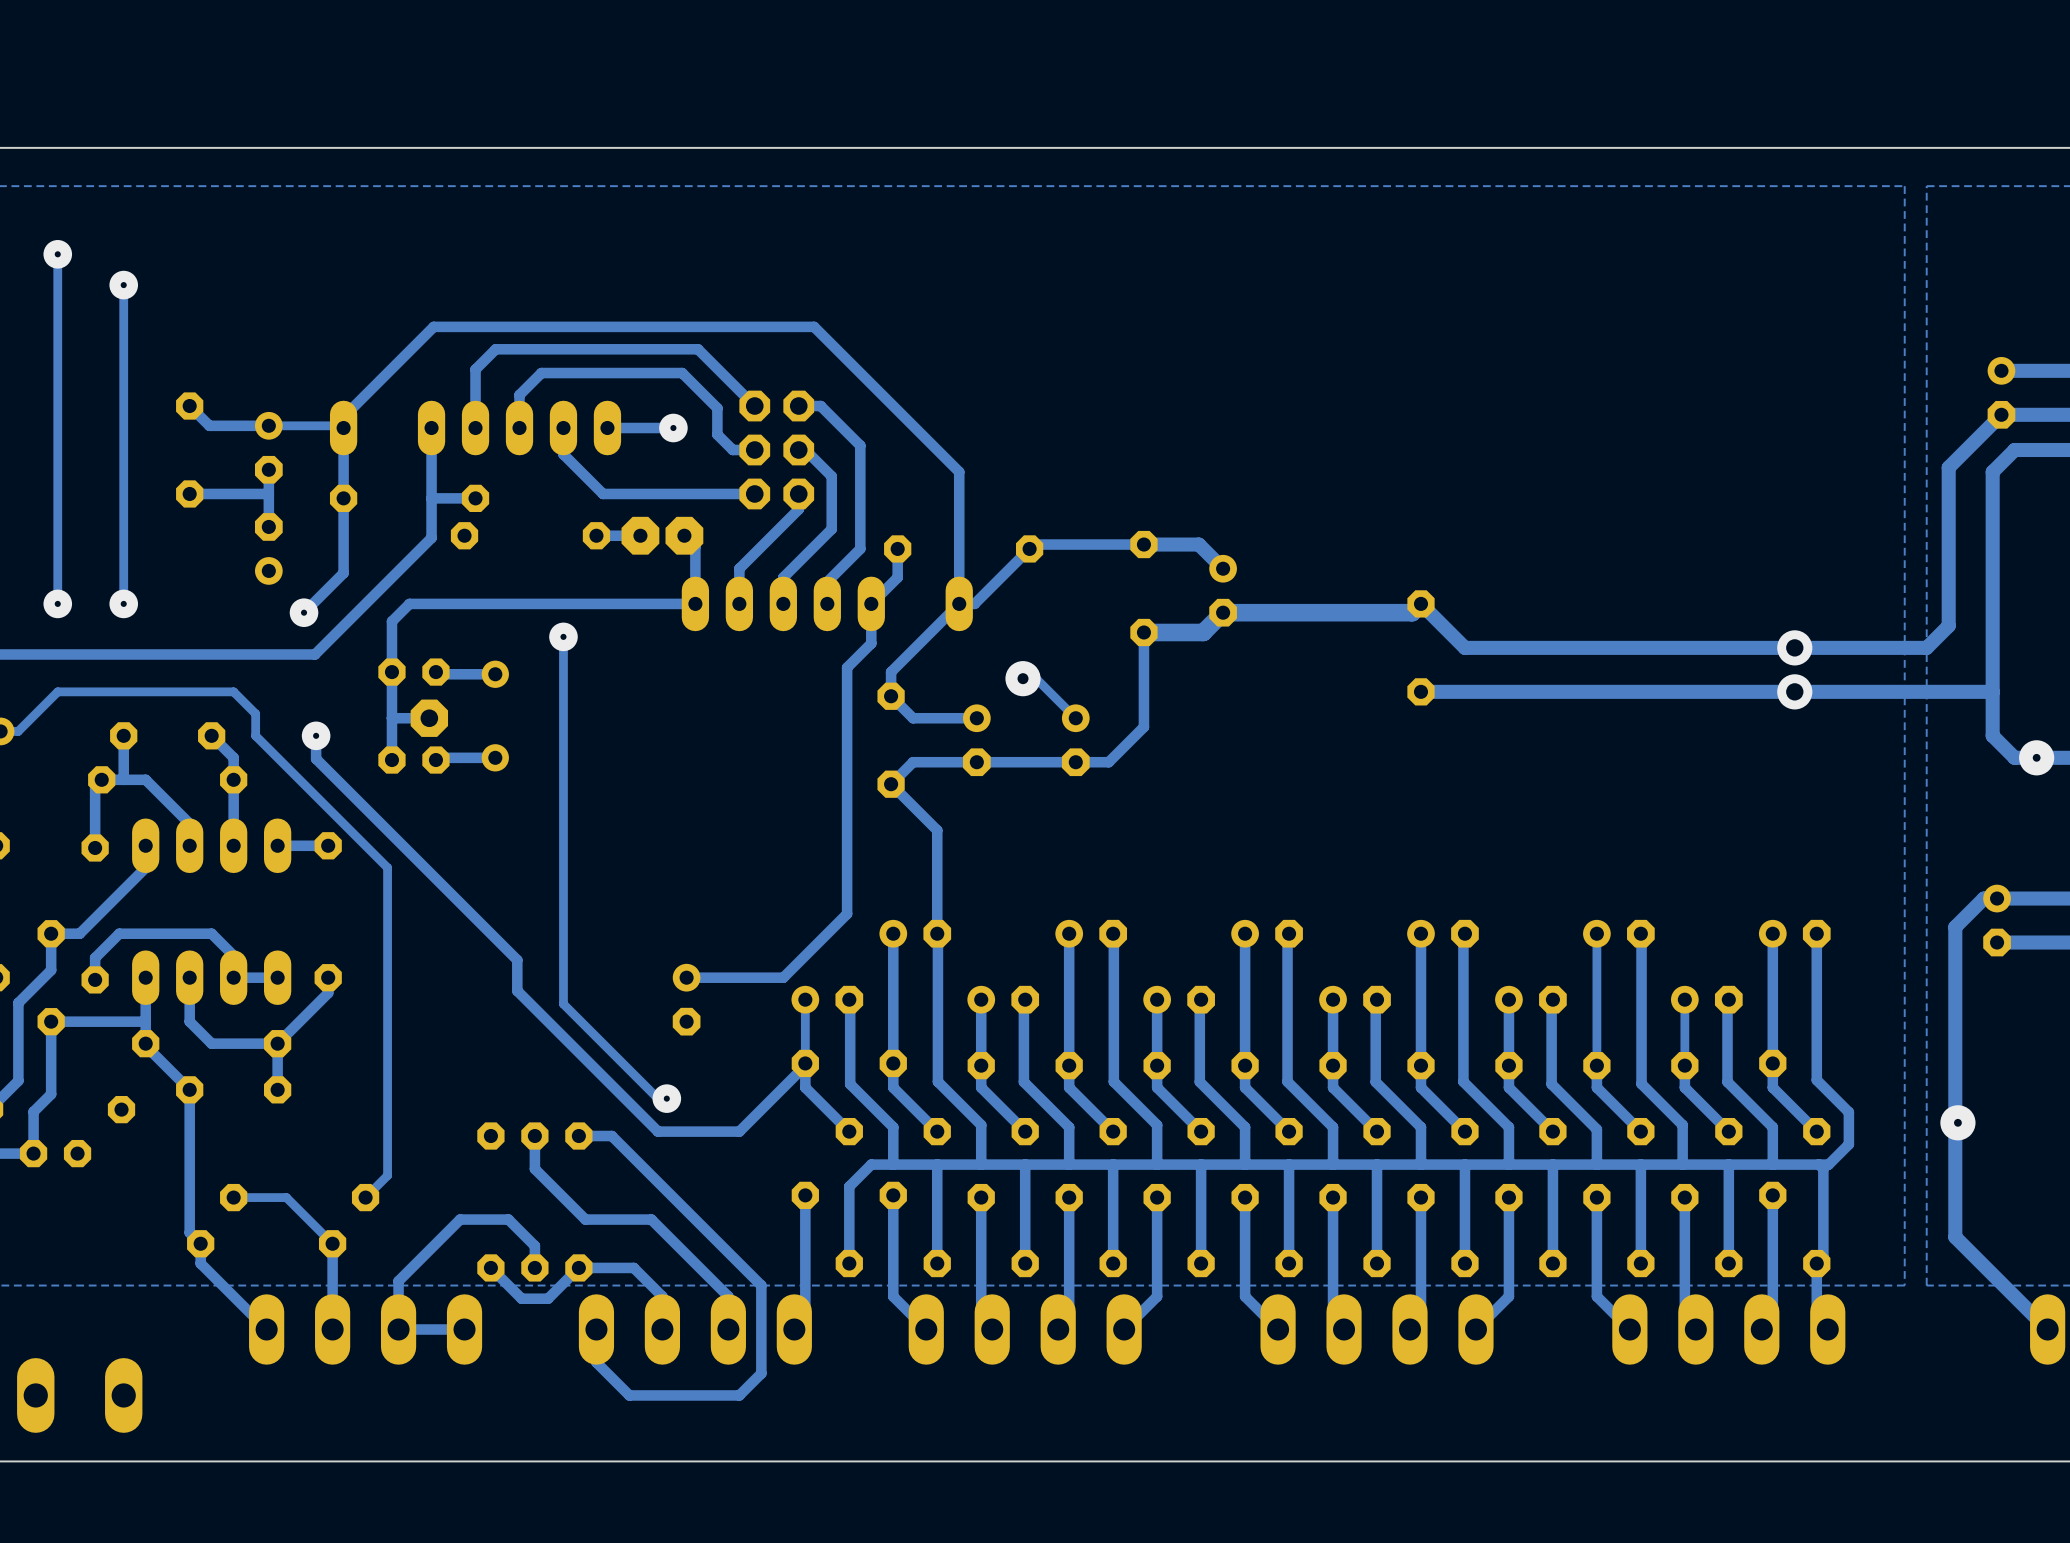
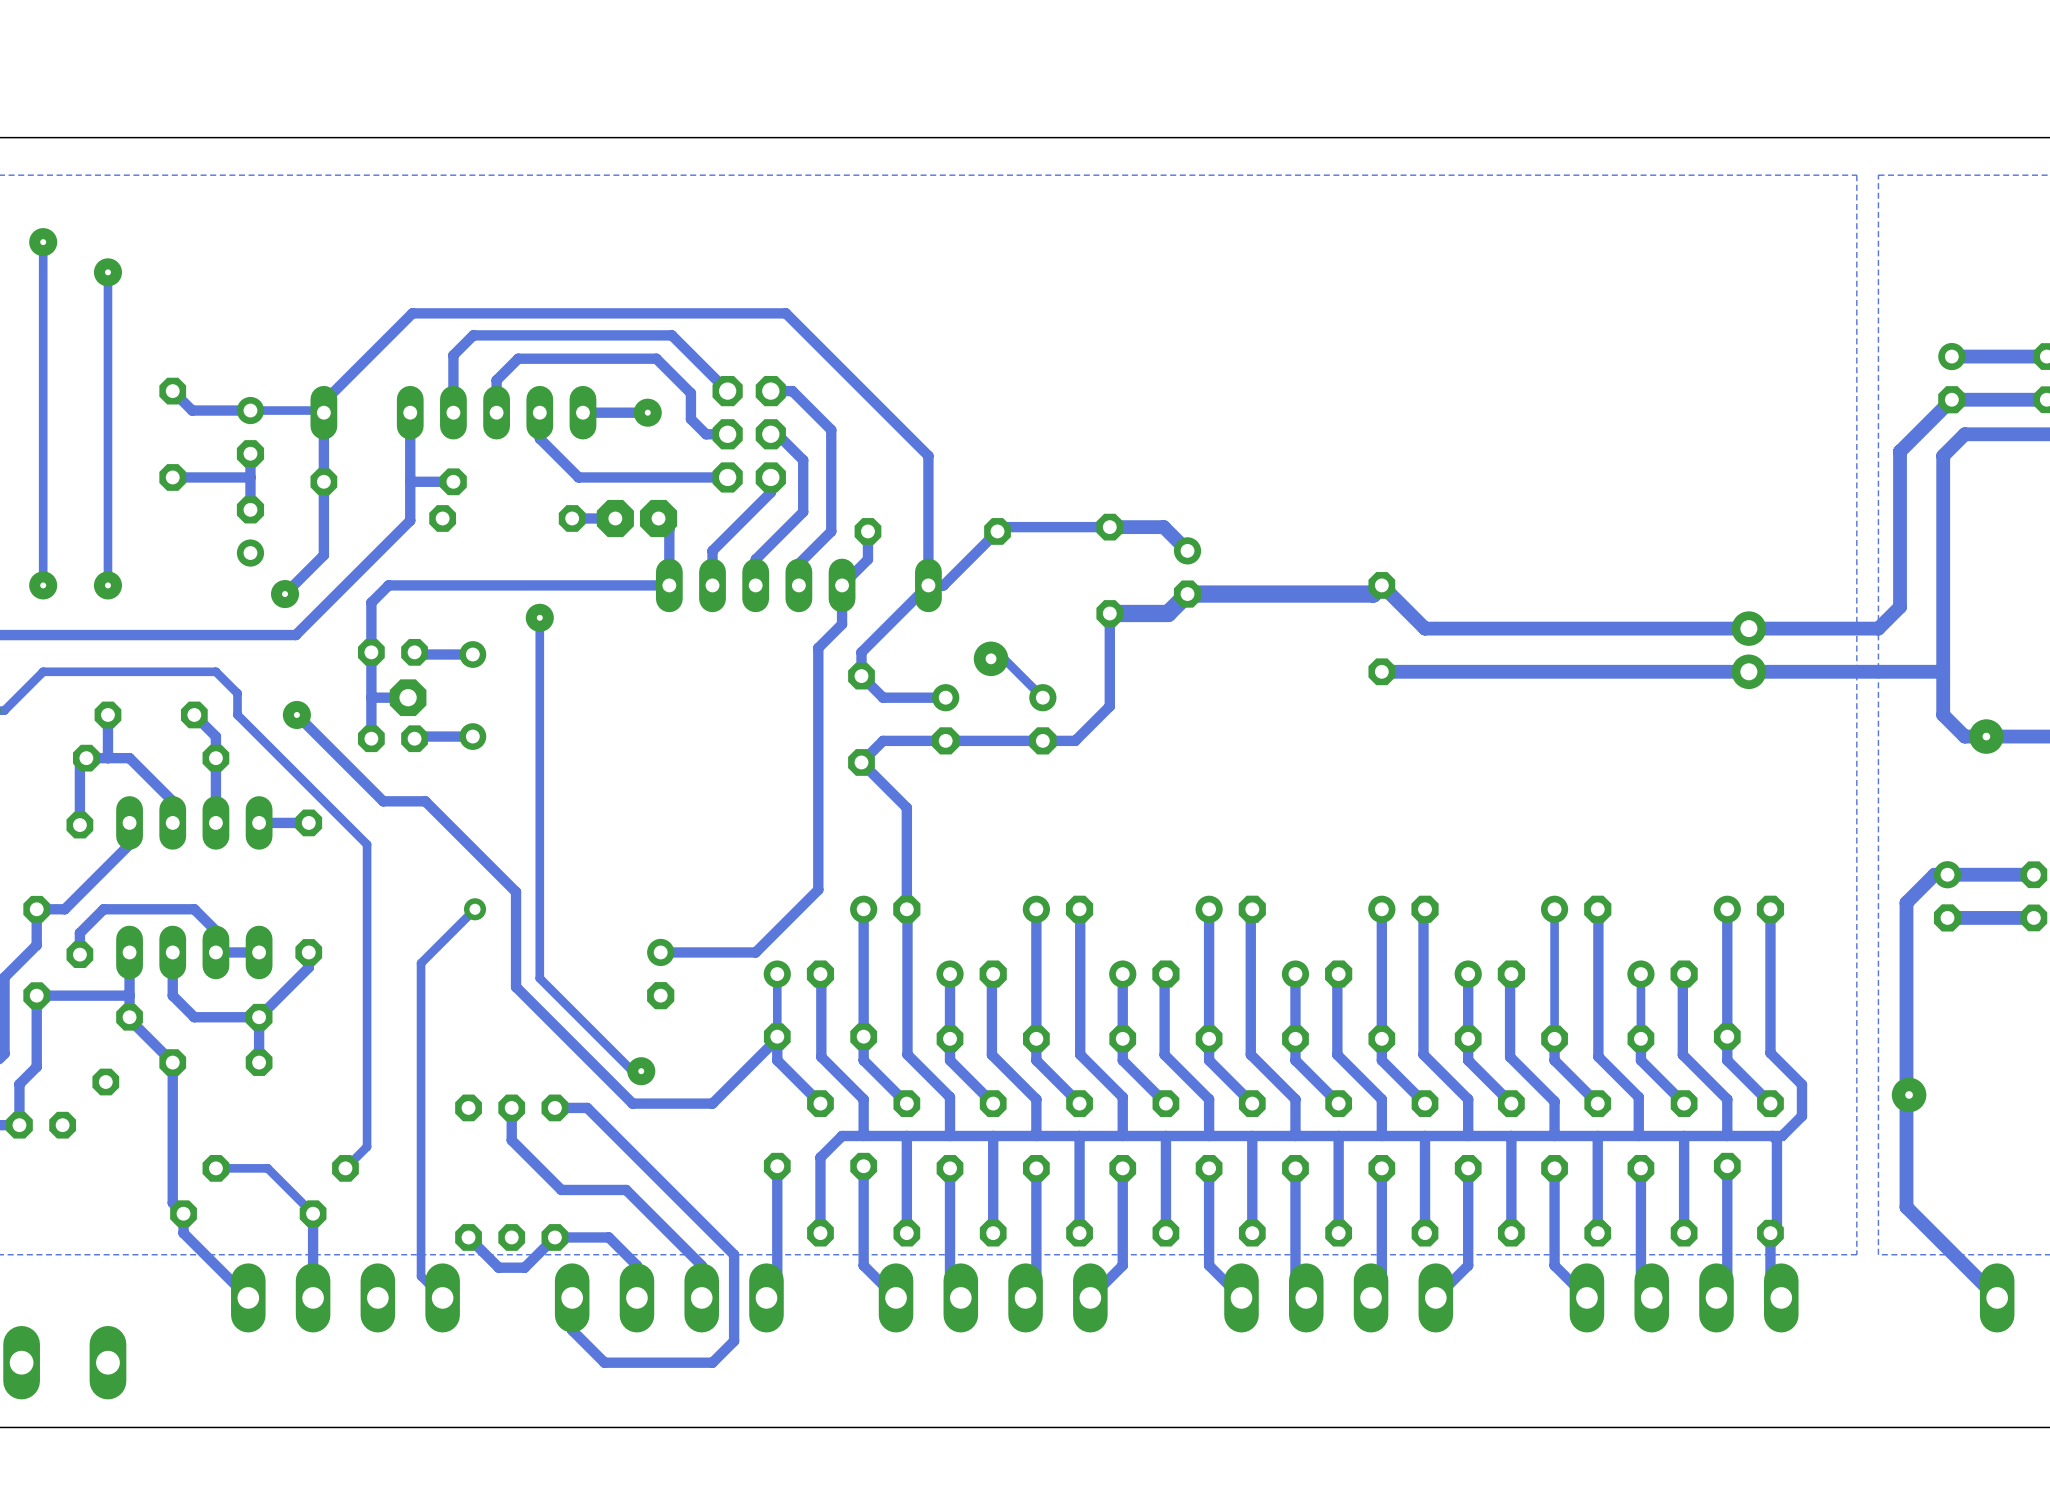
track: (316, 735) (316, 758) (517, 960) (517, 990) (539, 1012) -> (296, 714) (383, 801) (425, 801) (516, 892) (516, 987)
via: none -> (475, 909)
track: (534, 1267) (534, 1245) (508, 1219) (460, 1219) (398, 1281) (398, 1329) (464, 1329) -> (475, 909) (421, 963) (421, 1276) (442, 1297)

